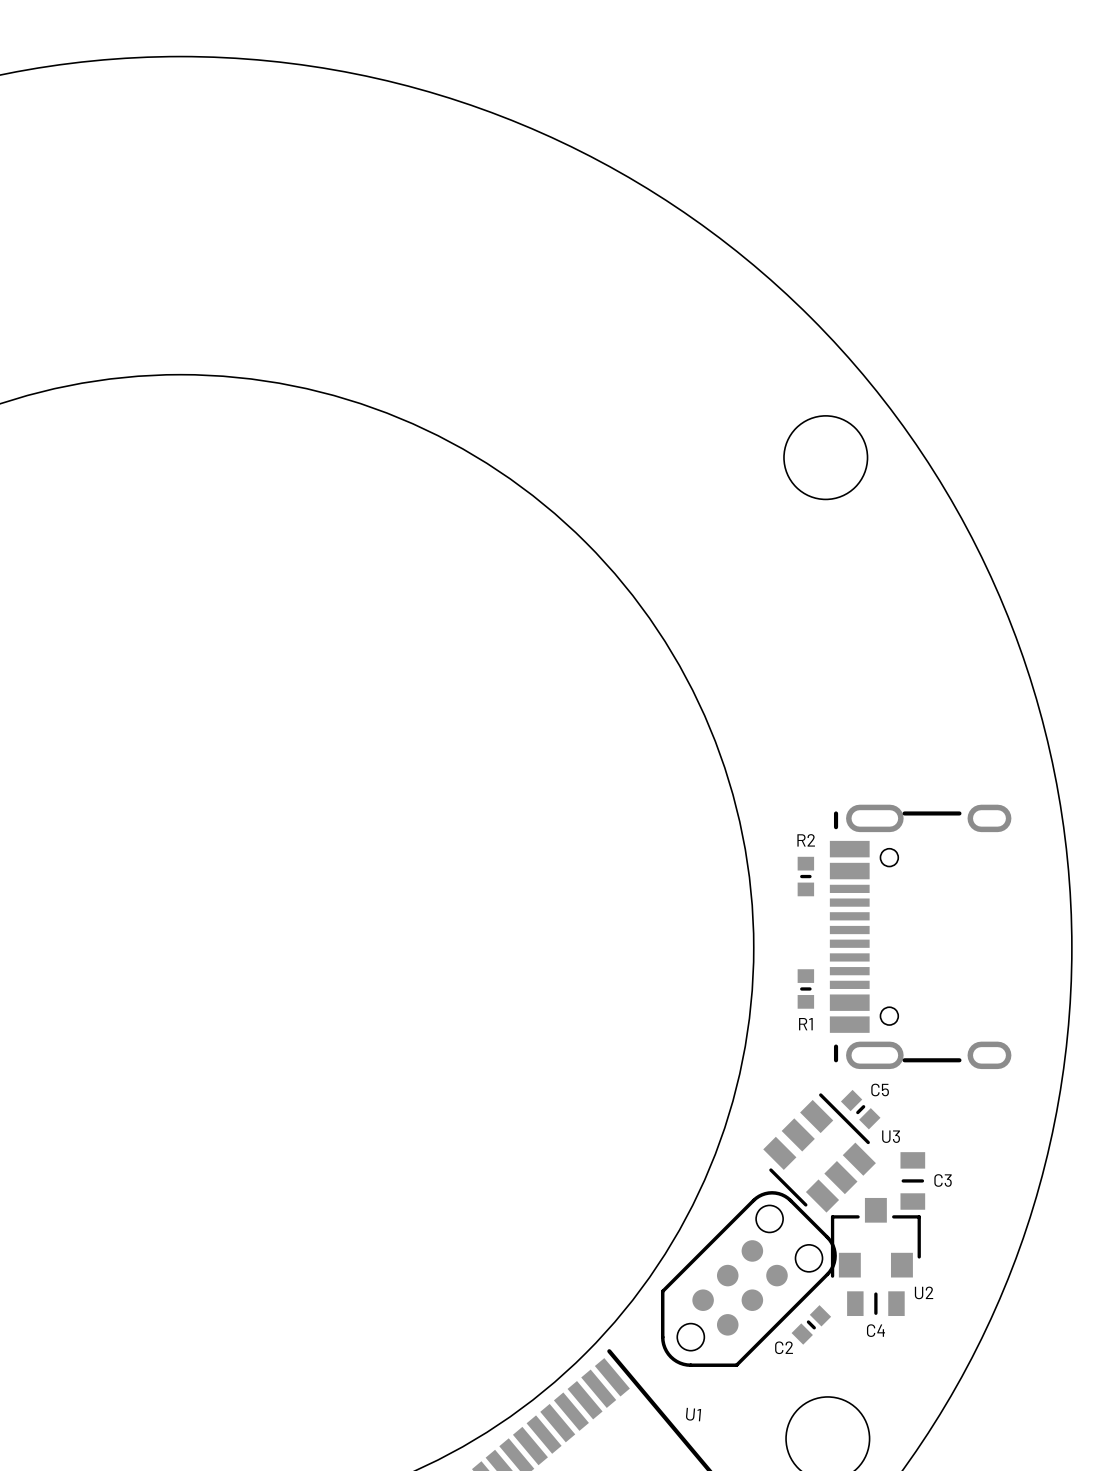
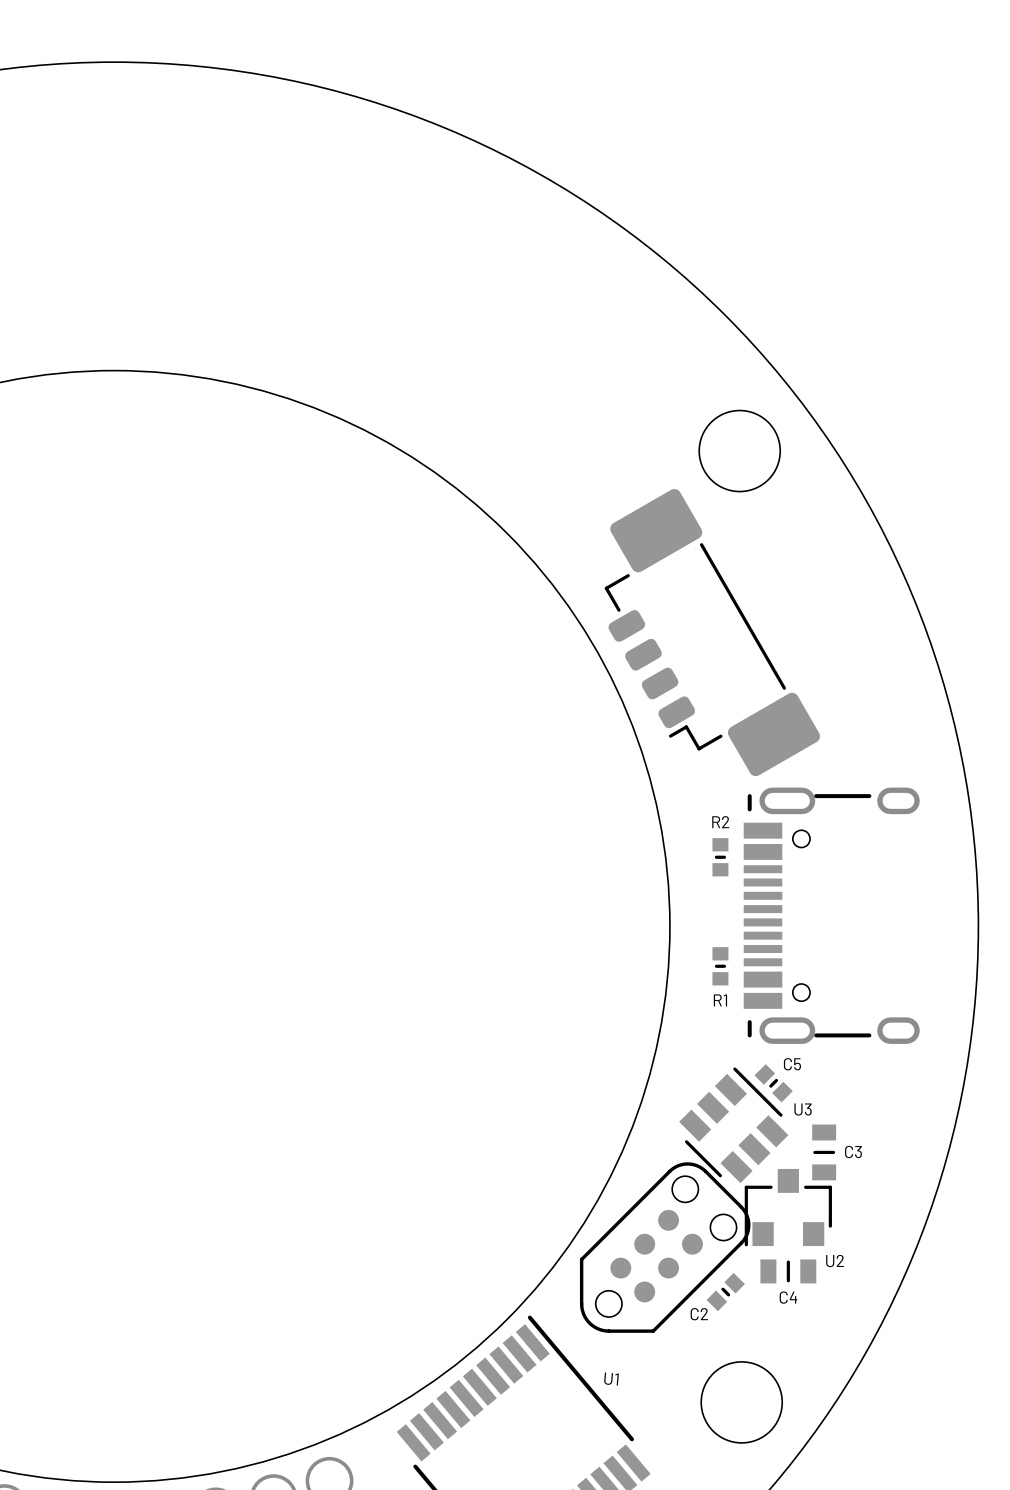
part: none -> (712, 632)

